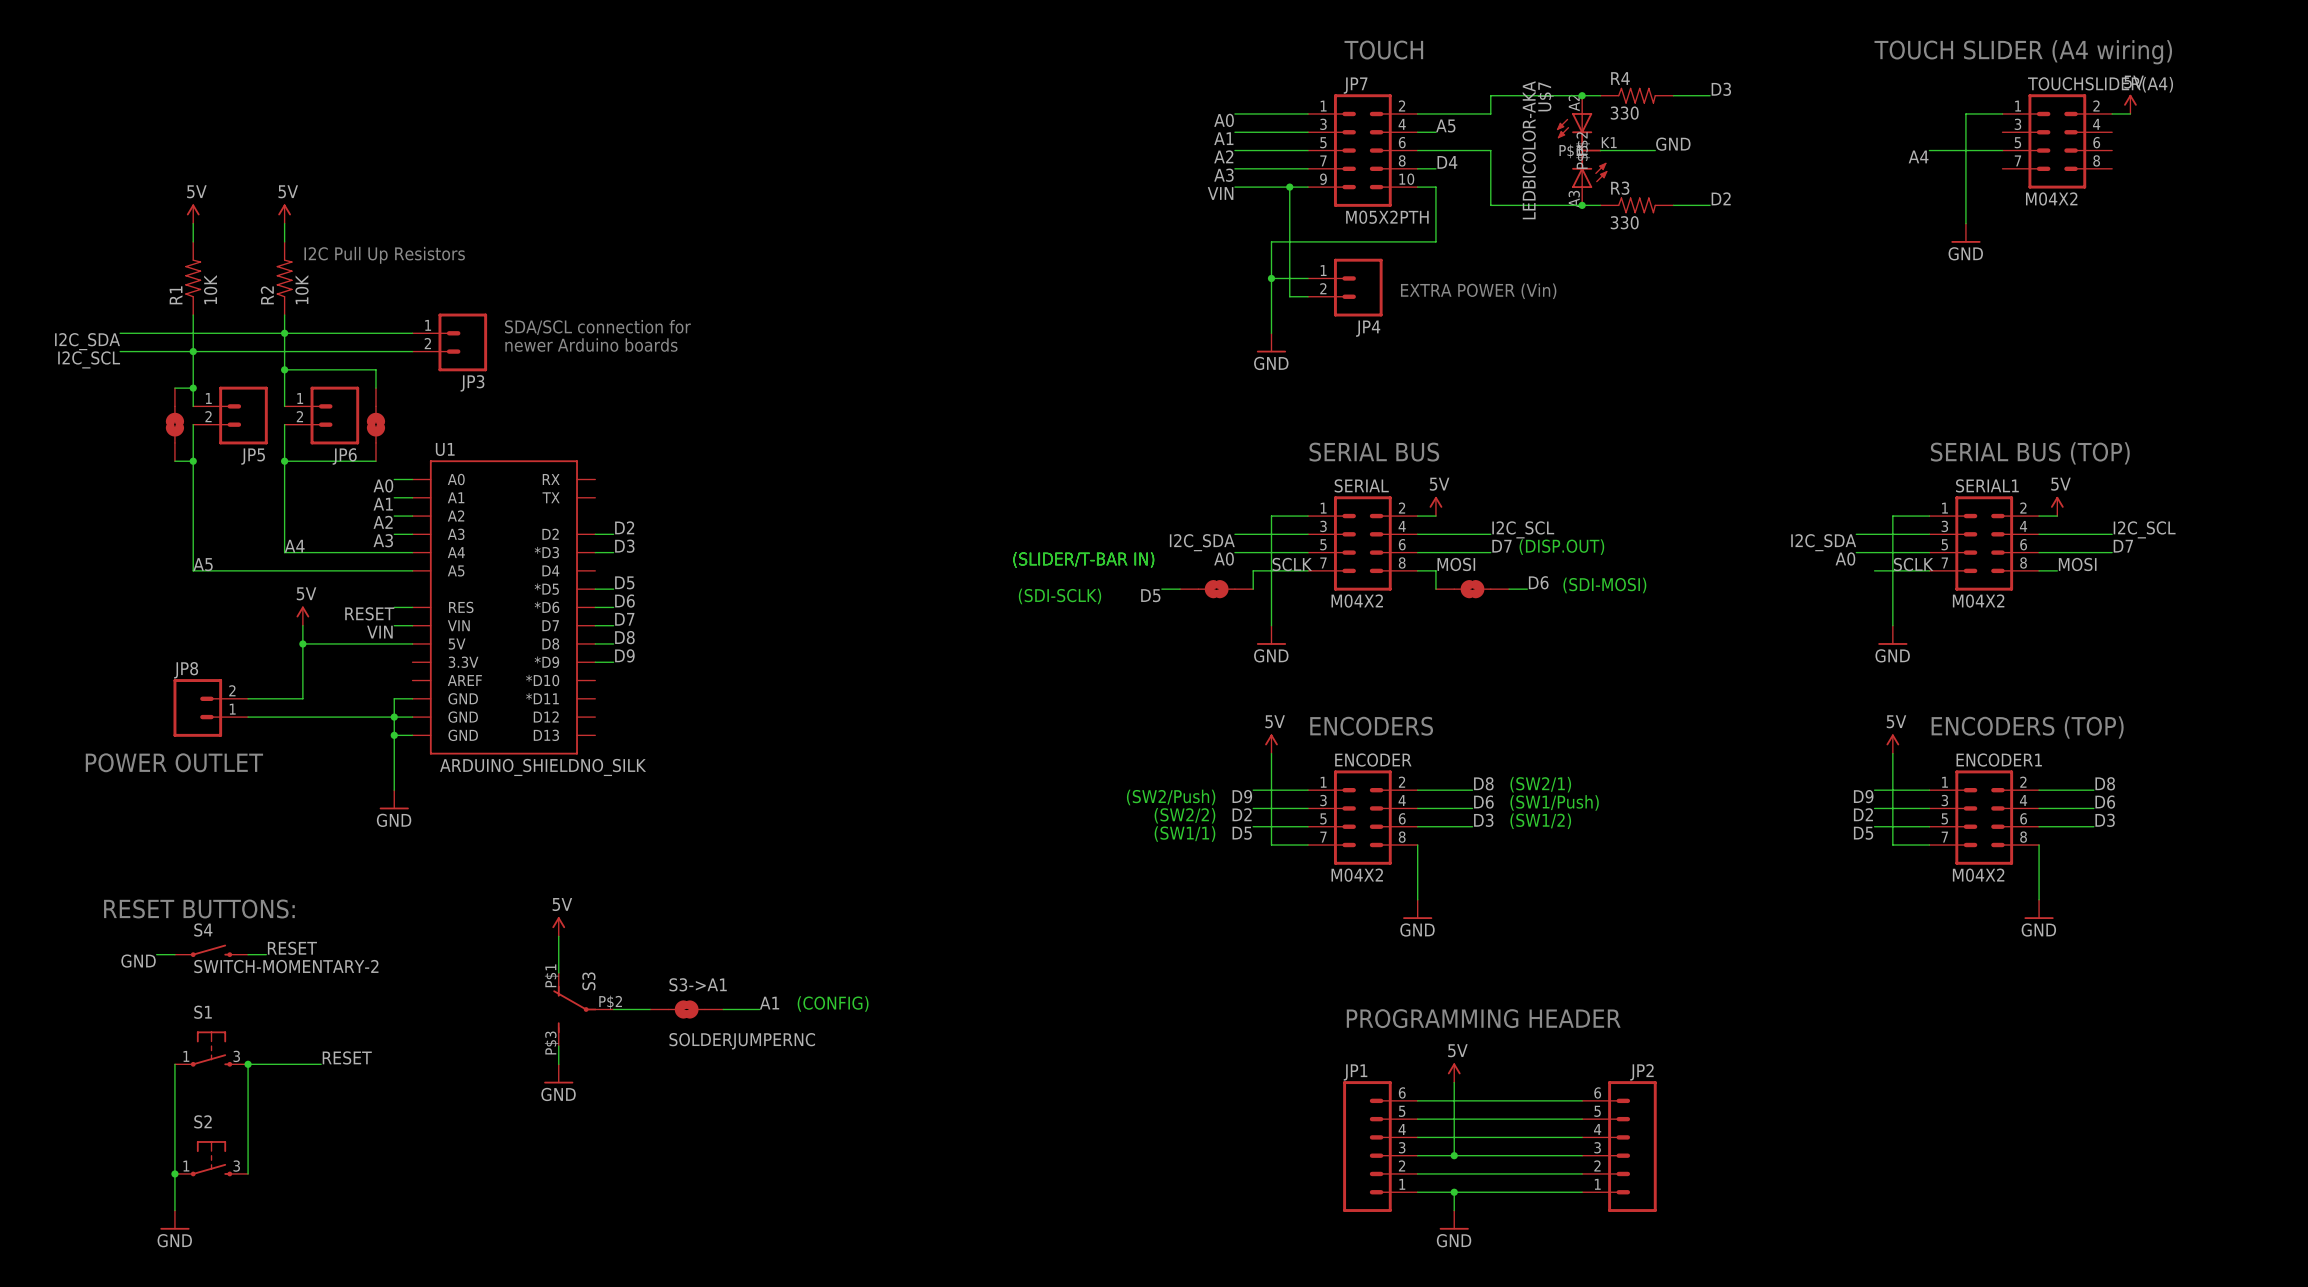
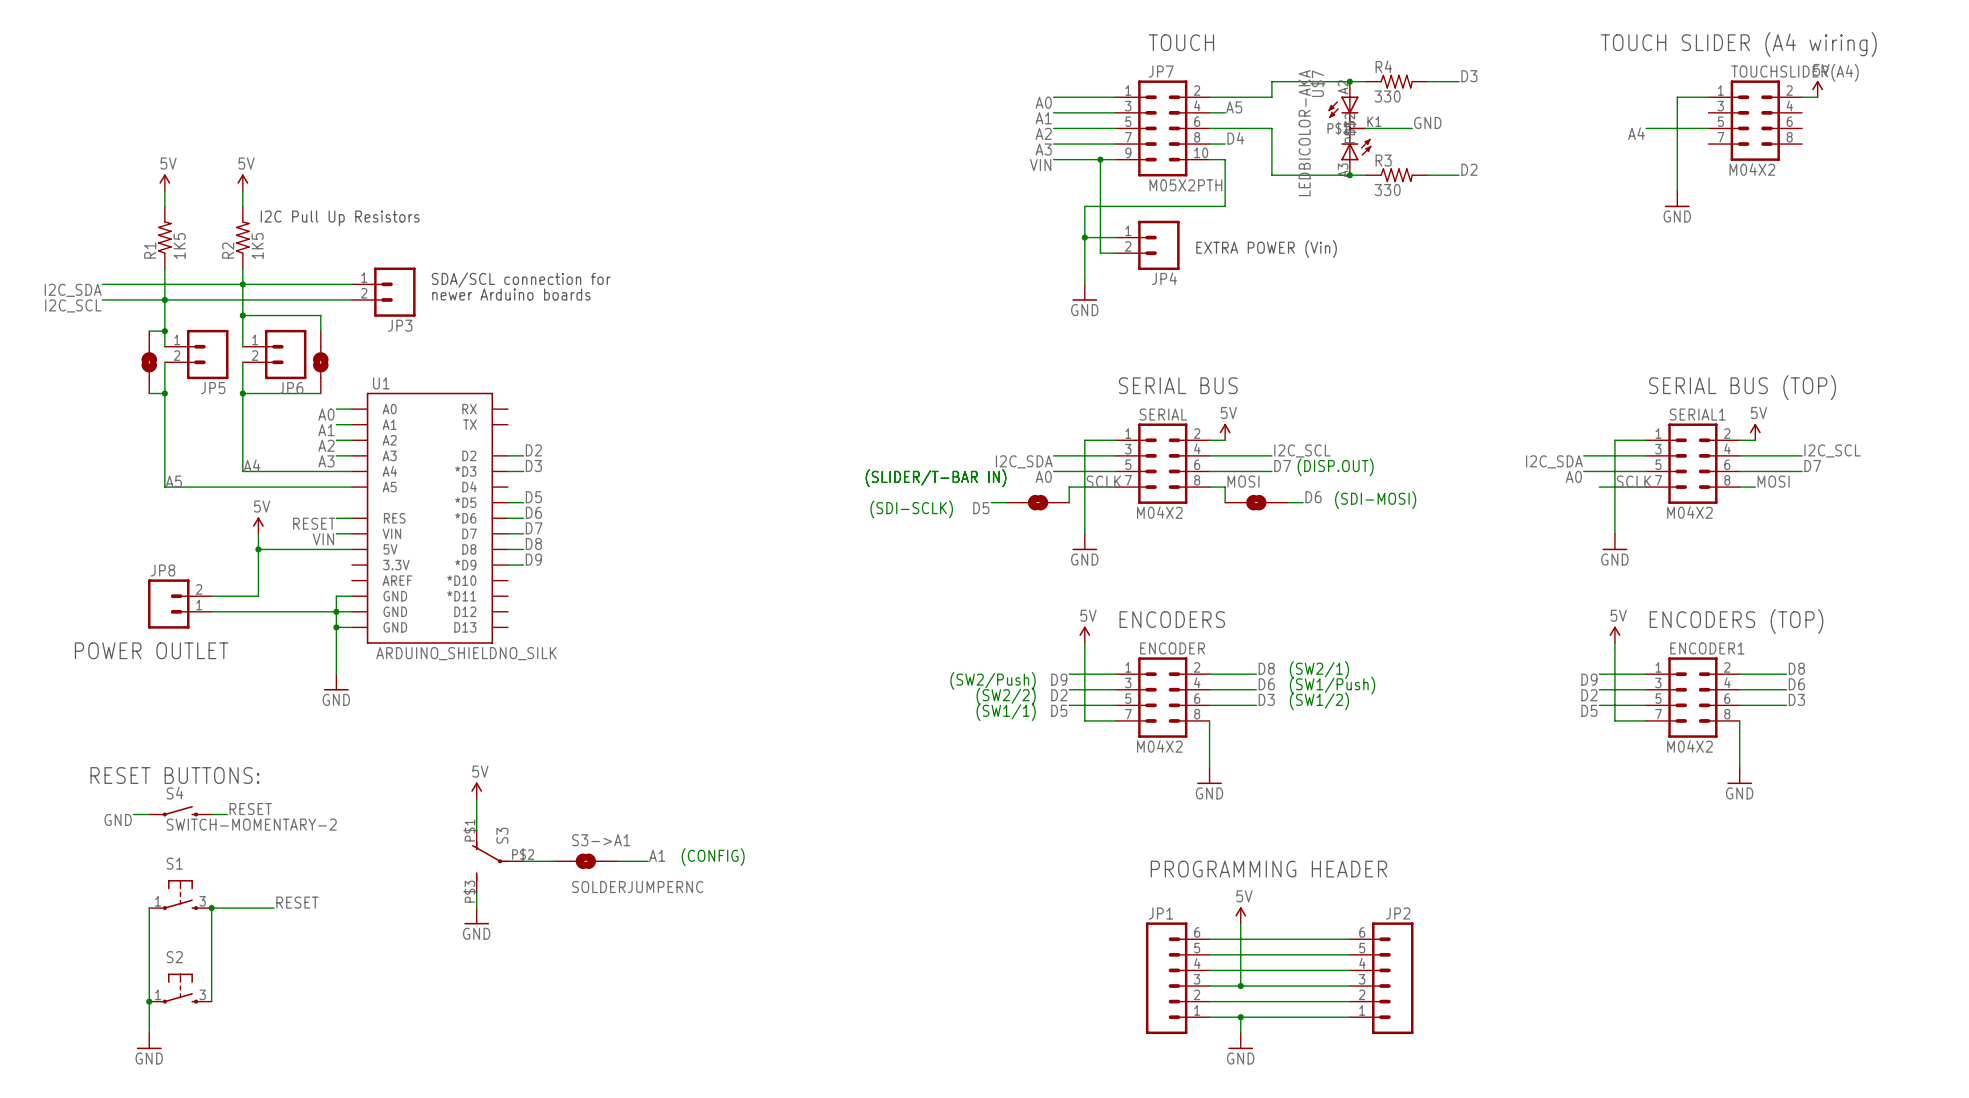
R1 value: 10K (210, 289) -> 1K5 (179, 246)
R2 value: 10K (301, 289) -> 1K5 (257, 246)

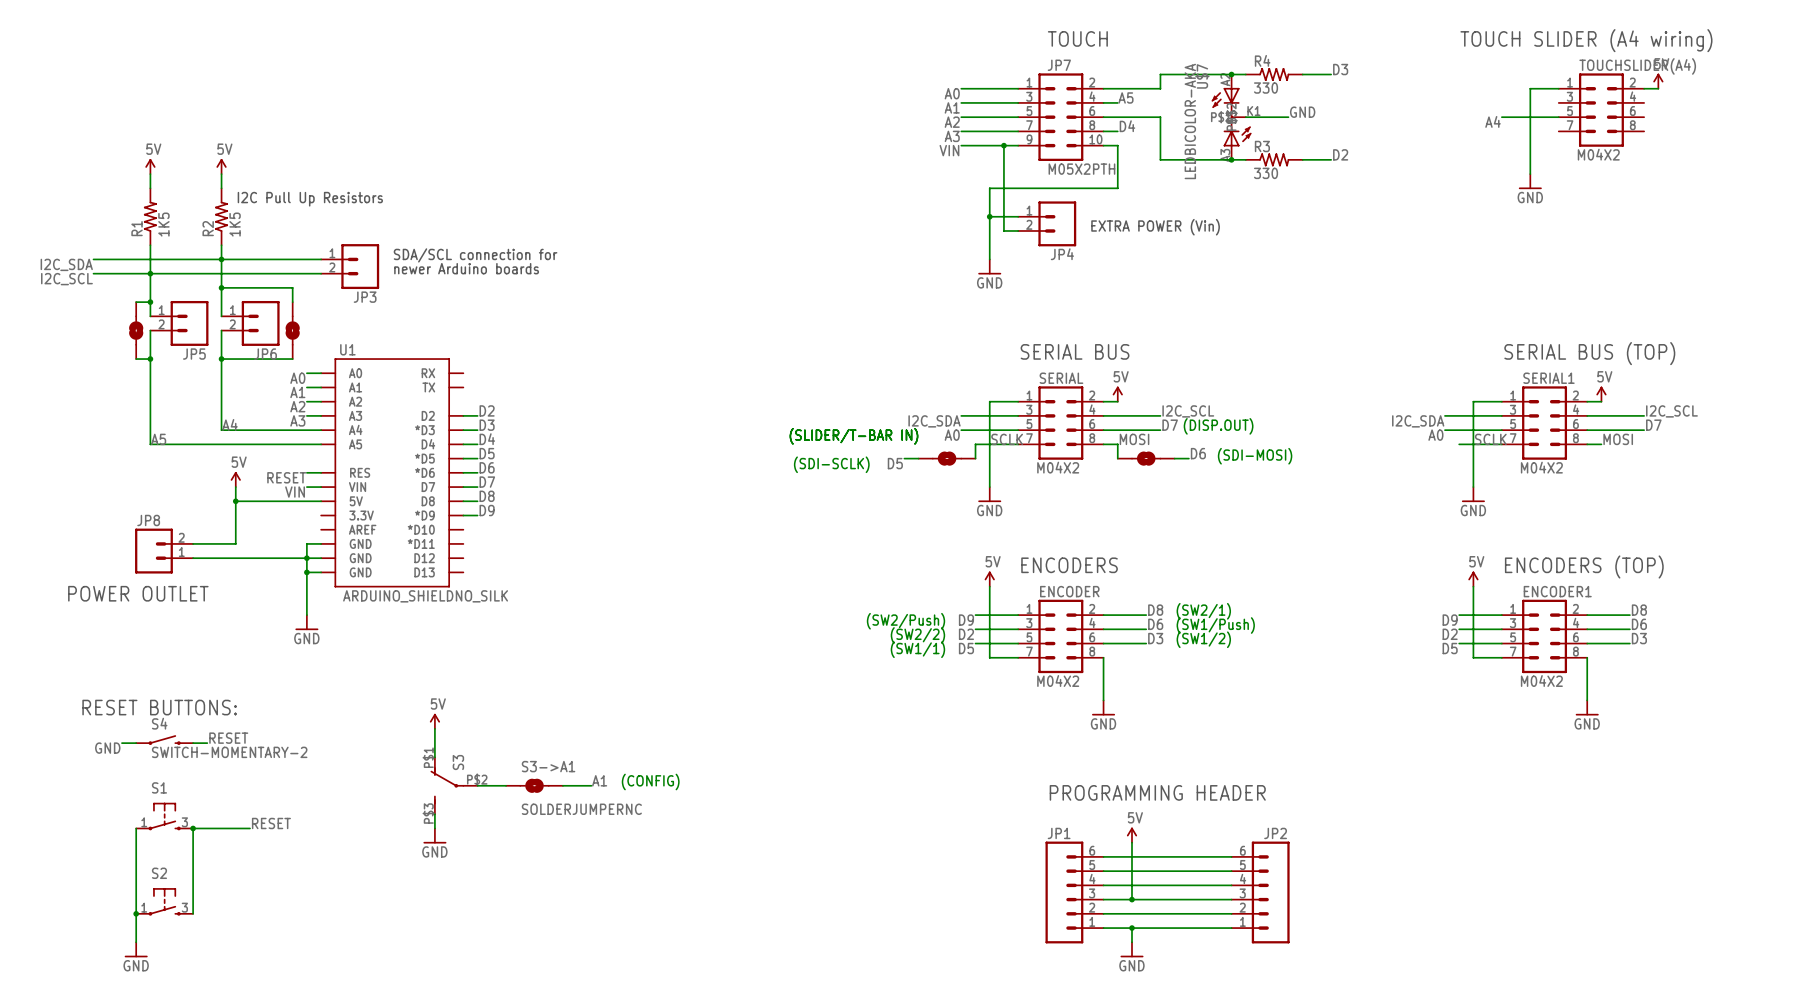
label: none -> D4 (487, 439)
wire: none -> (463, 444) (477, 444)

